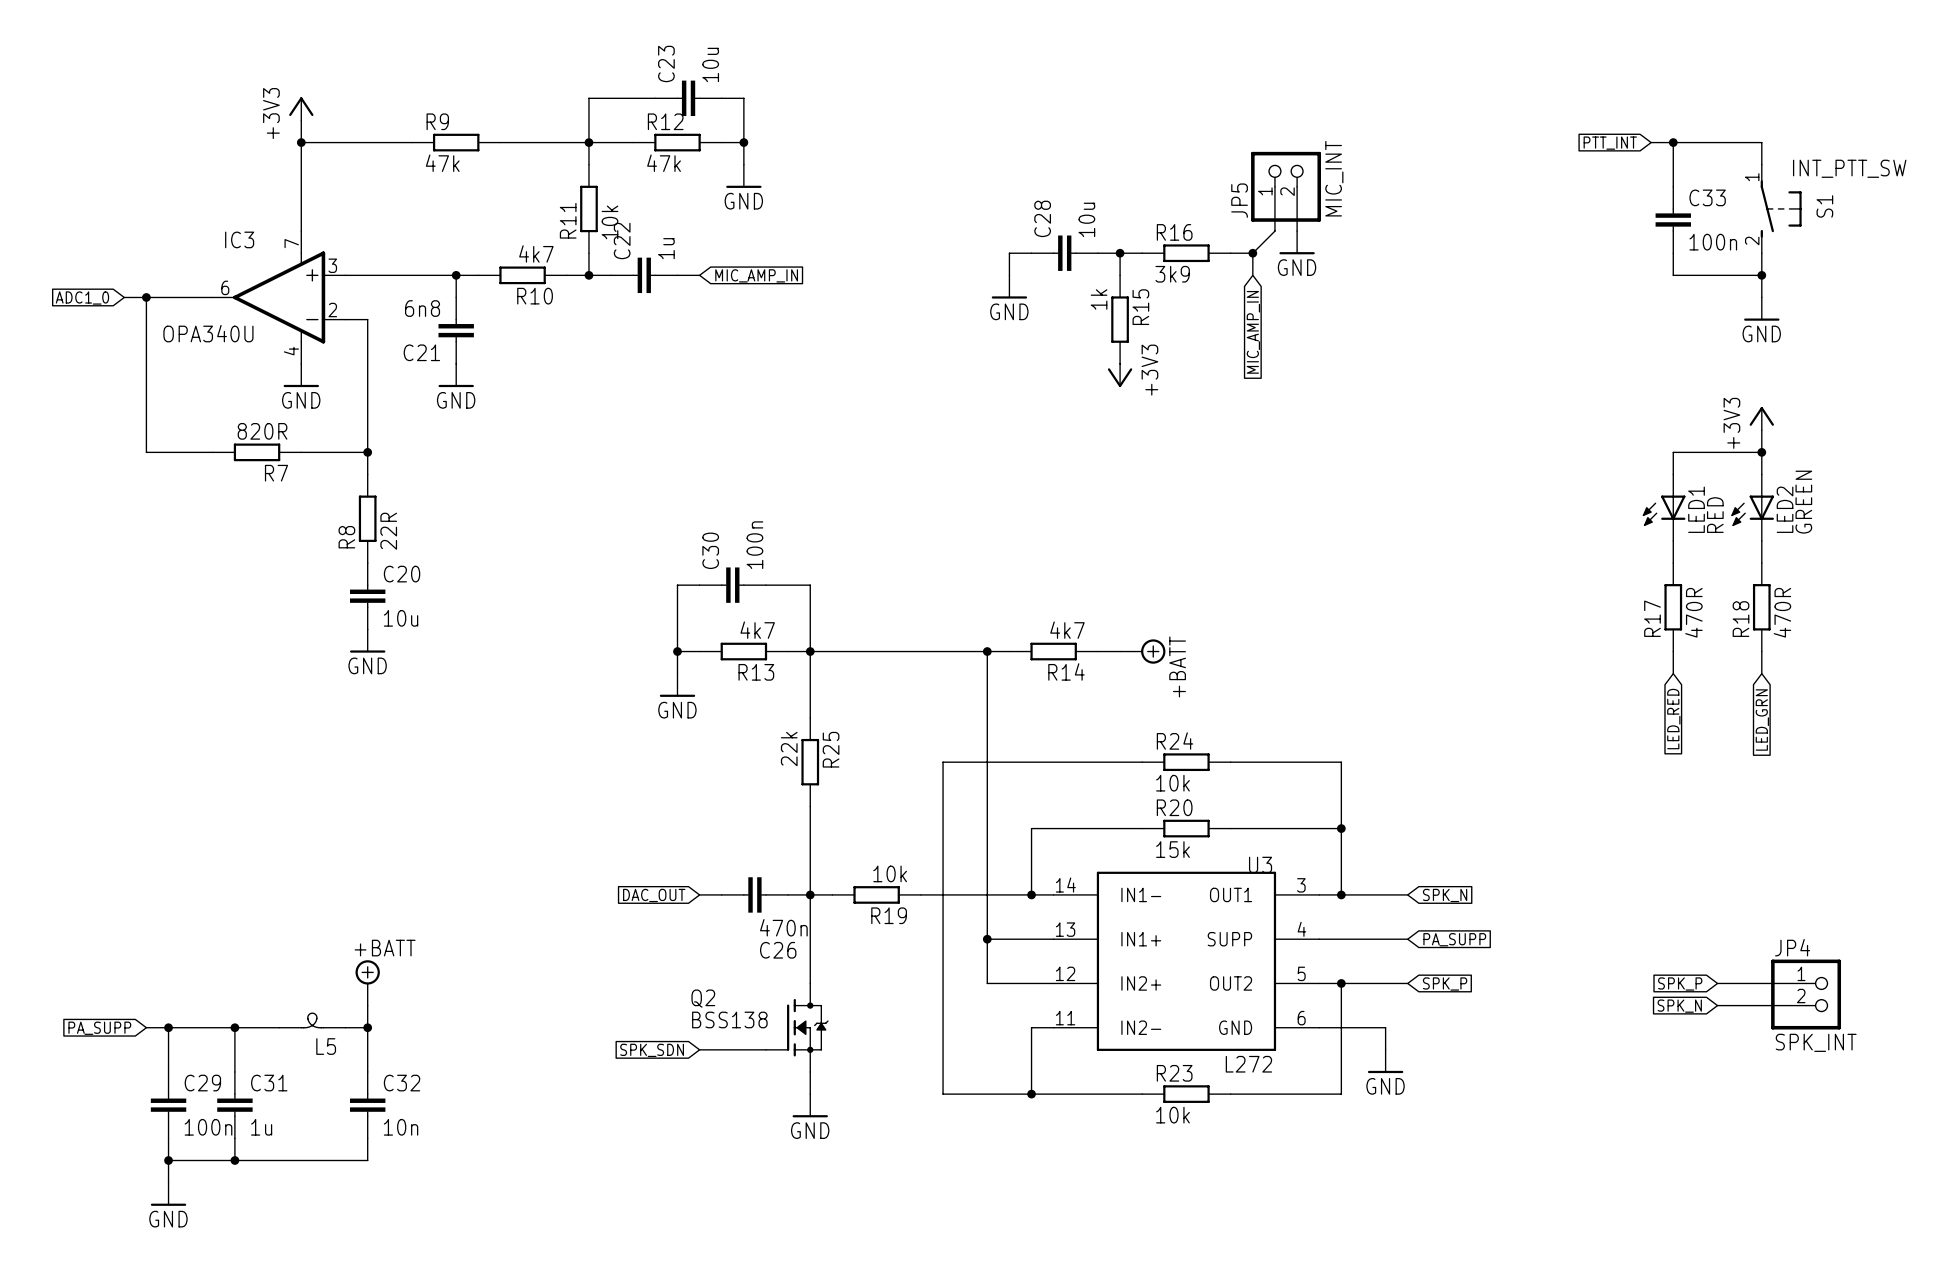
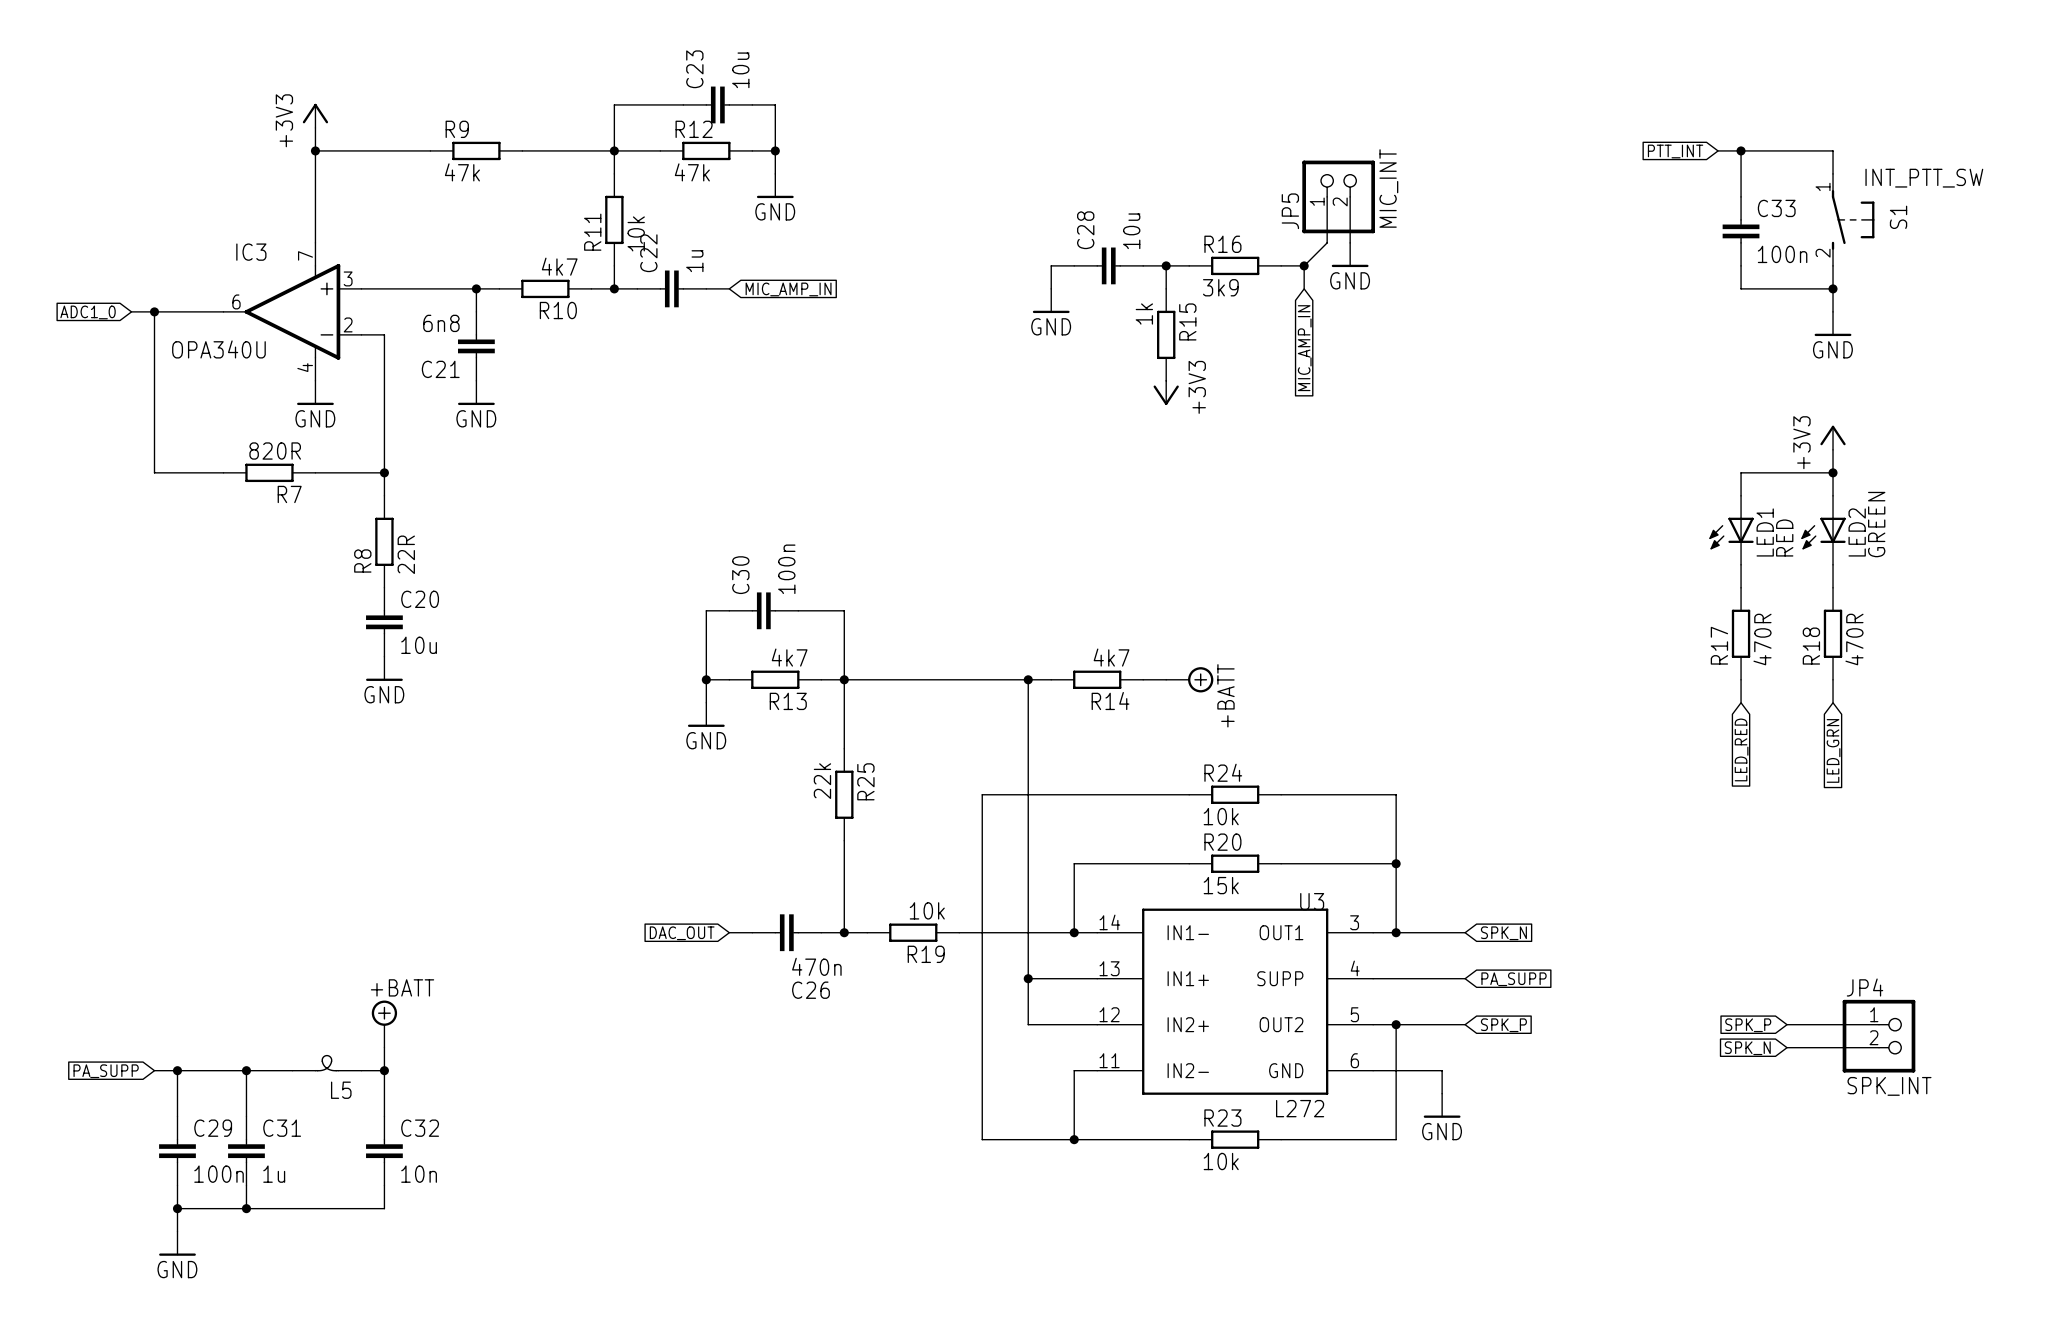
wire: (810, 894) (810, 983) -> none
Q2: BSS138 (797, 1027) -> none
wire: (699, 1049) (766, 1049) -> none
global label: SPK_SDN (652, 1050) -> none
wire: (810, 1071) (810, 1094) -> none
power symbol: GND (810, 1105) -> none

